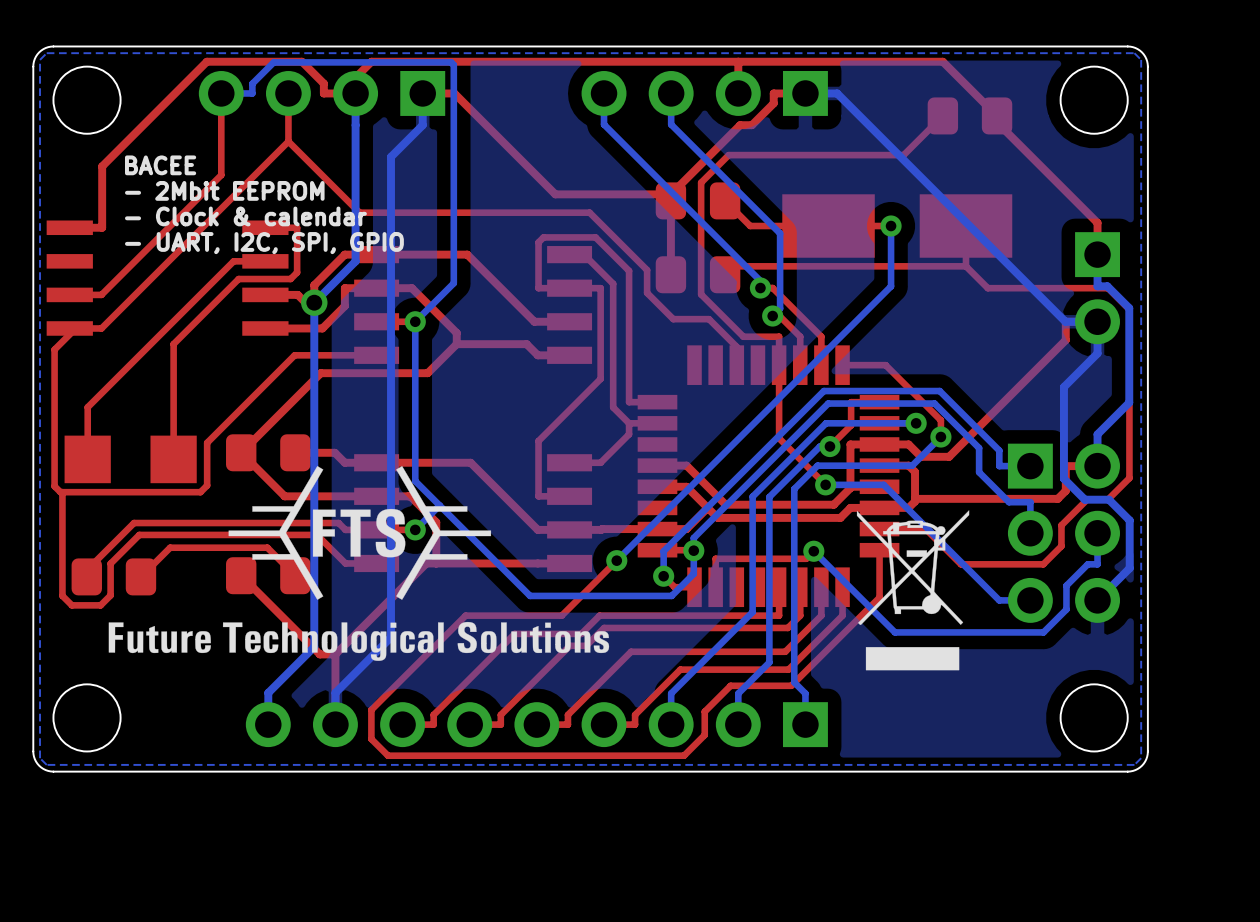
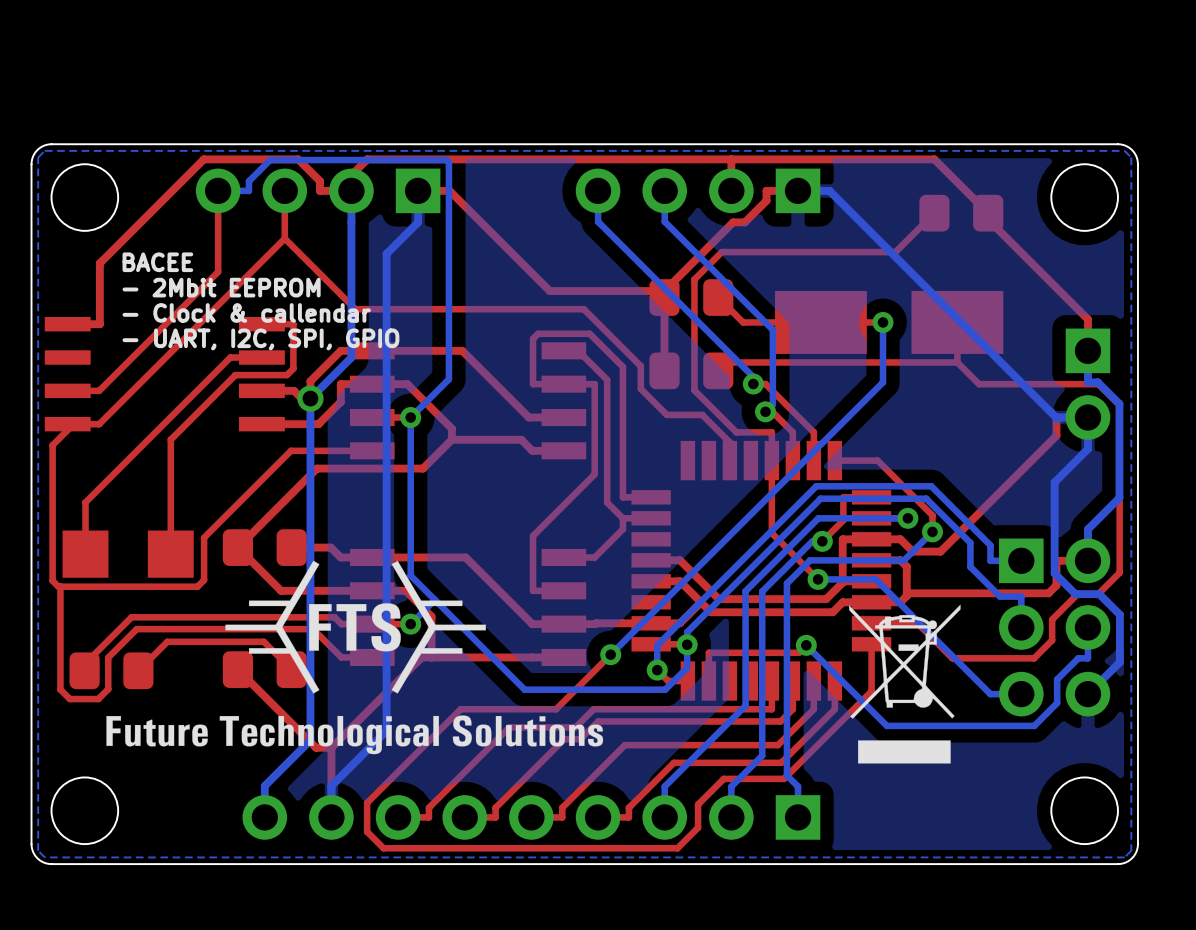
text: - Clock & calendar (245, 216) -> - Clock & callendar (246, 312)

